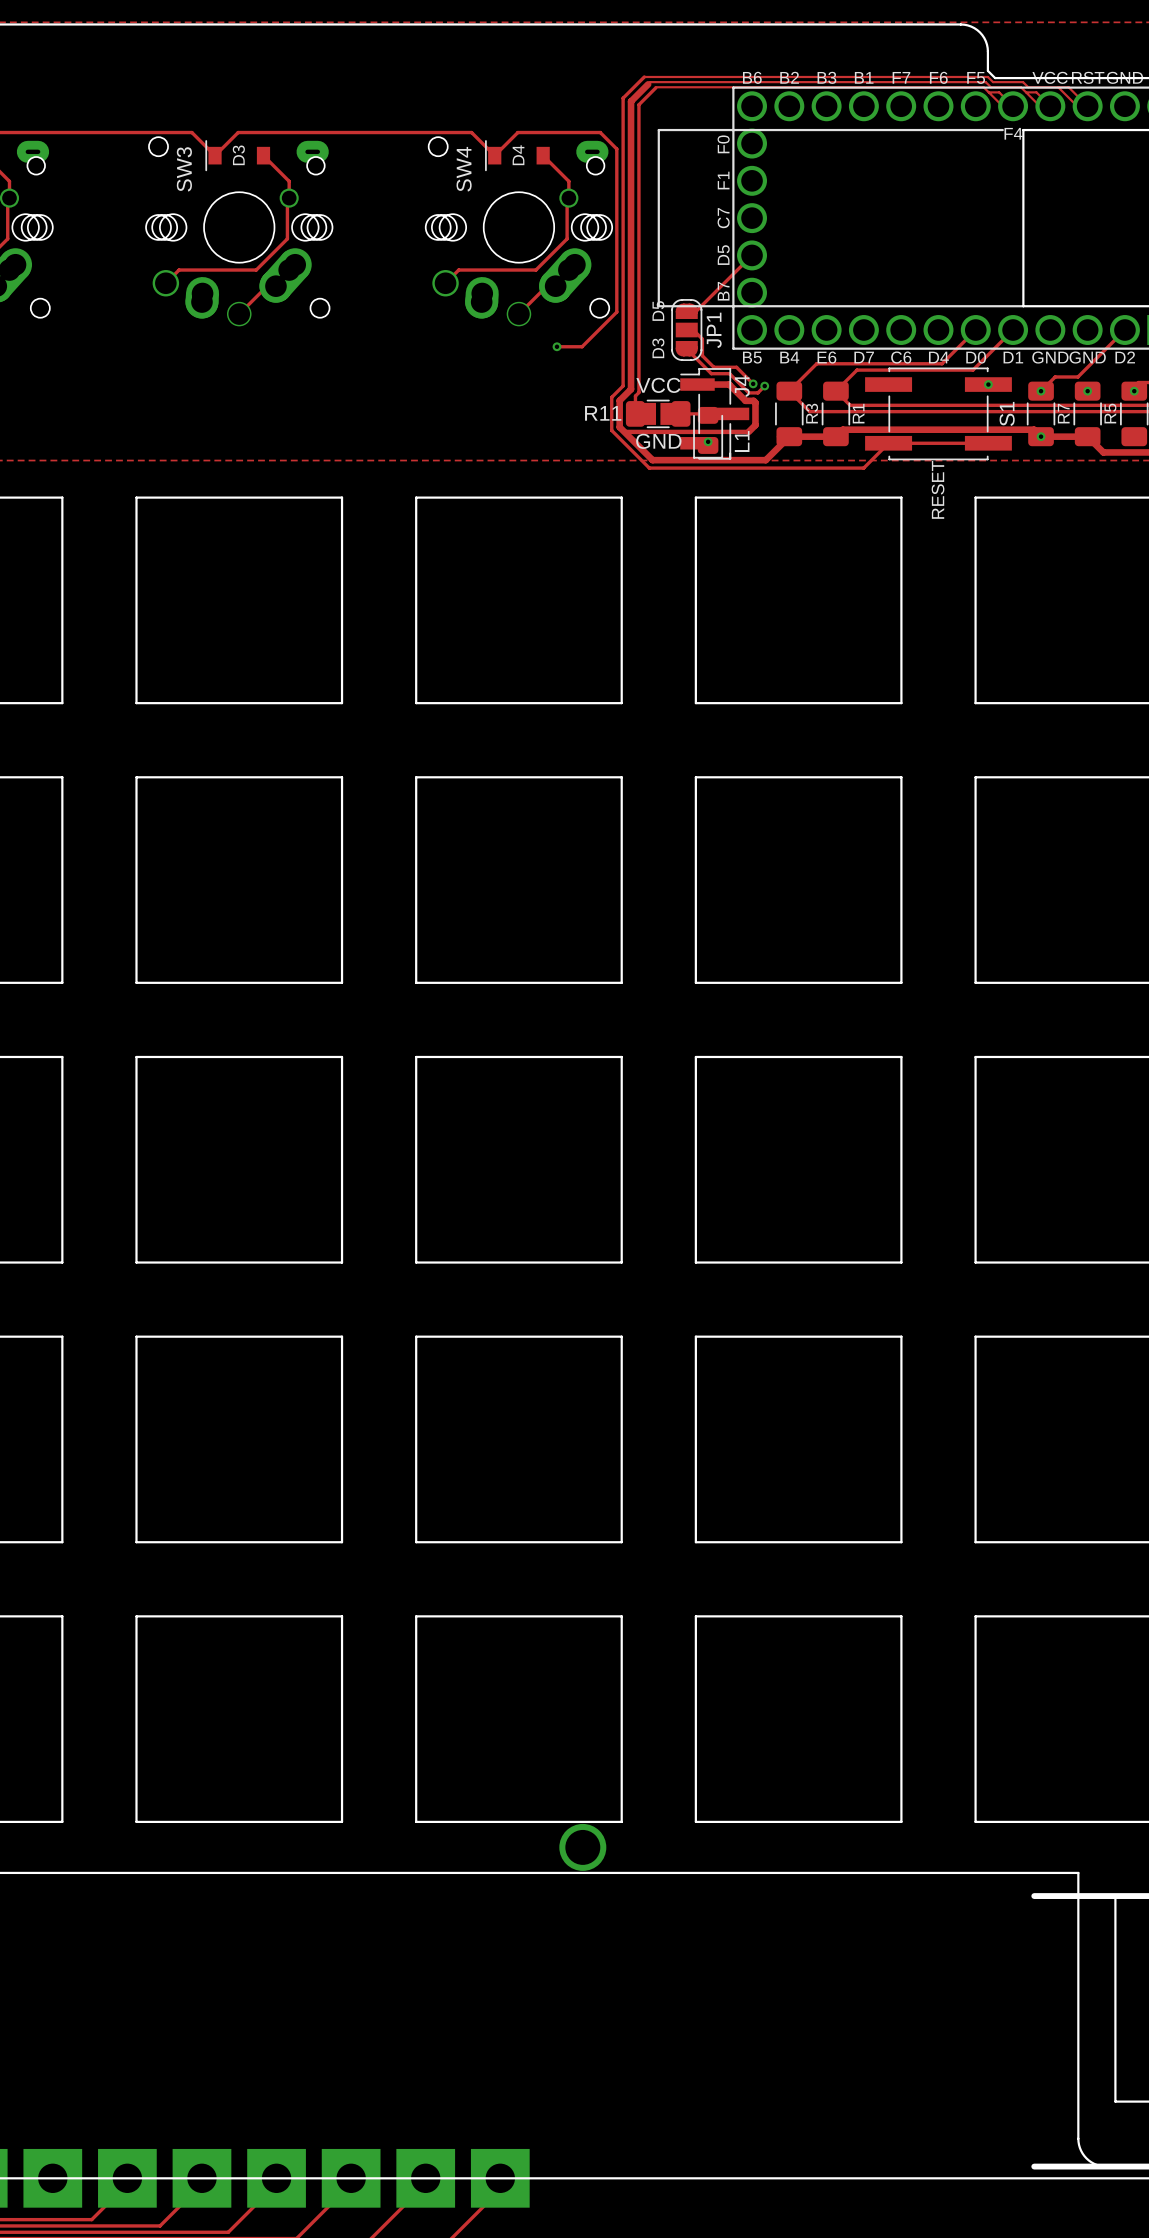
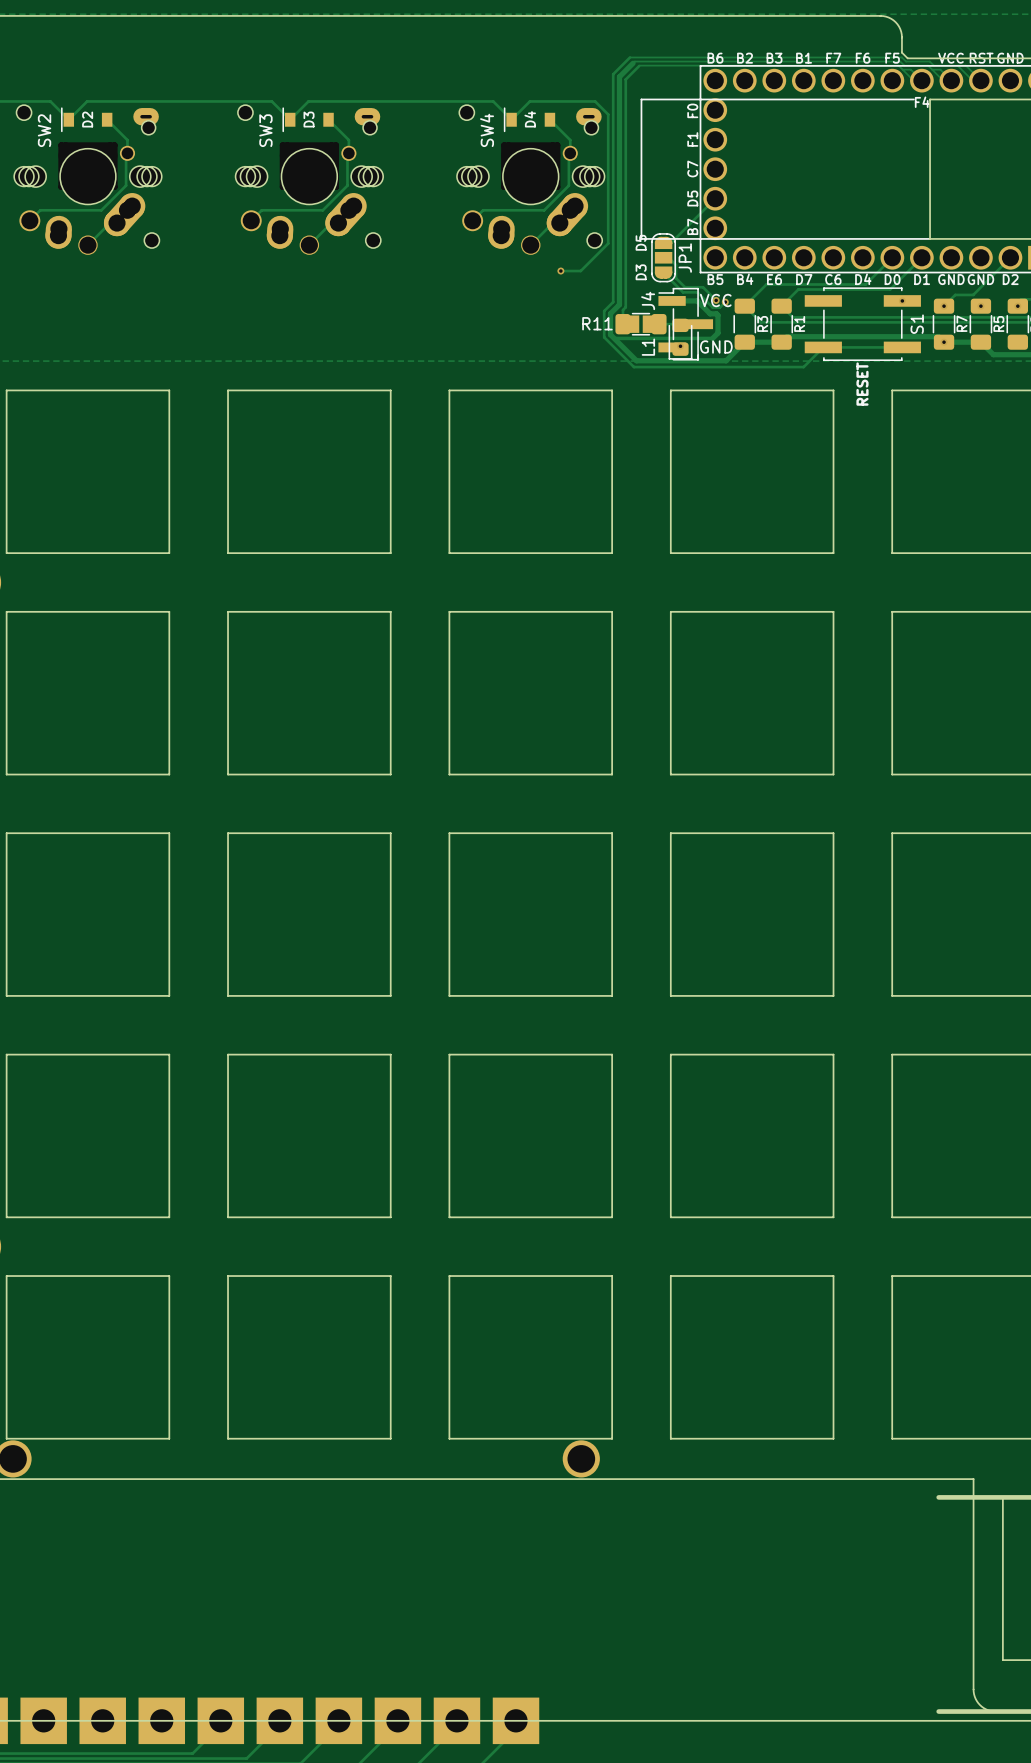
text position: VCC (658, 385) -> VCC (715, 300)
J4 name position: J4 (742, 386) -> J4 (648, 300)
text position: GND (658, 441) -> GND (716, 346)
L1 name position: L1 (742, 441) -> L1 (648, 347)

